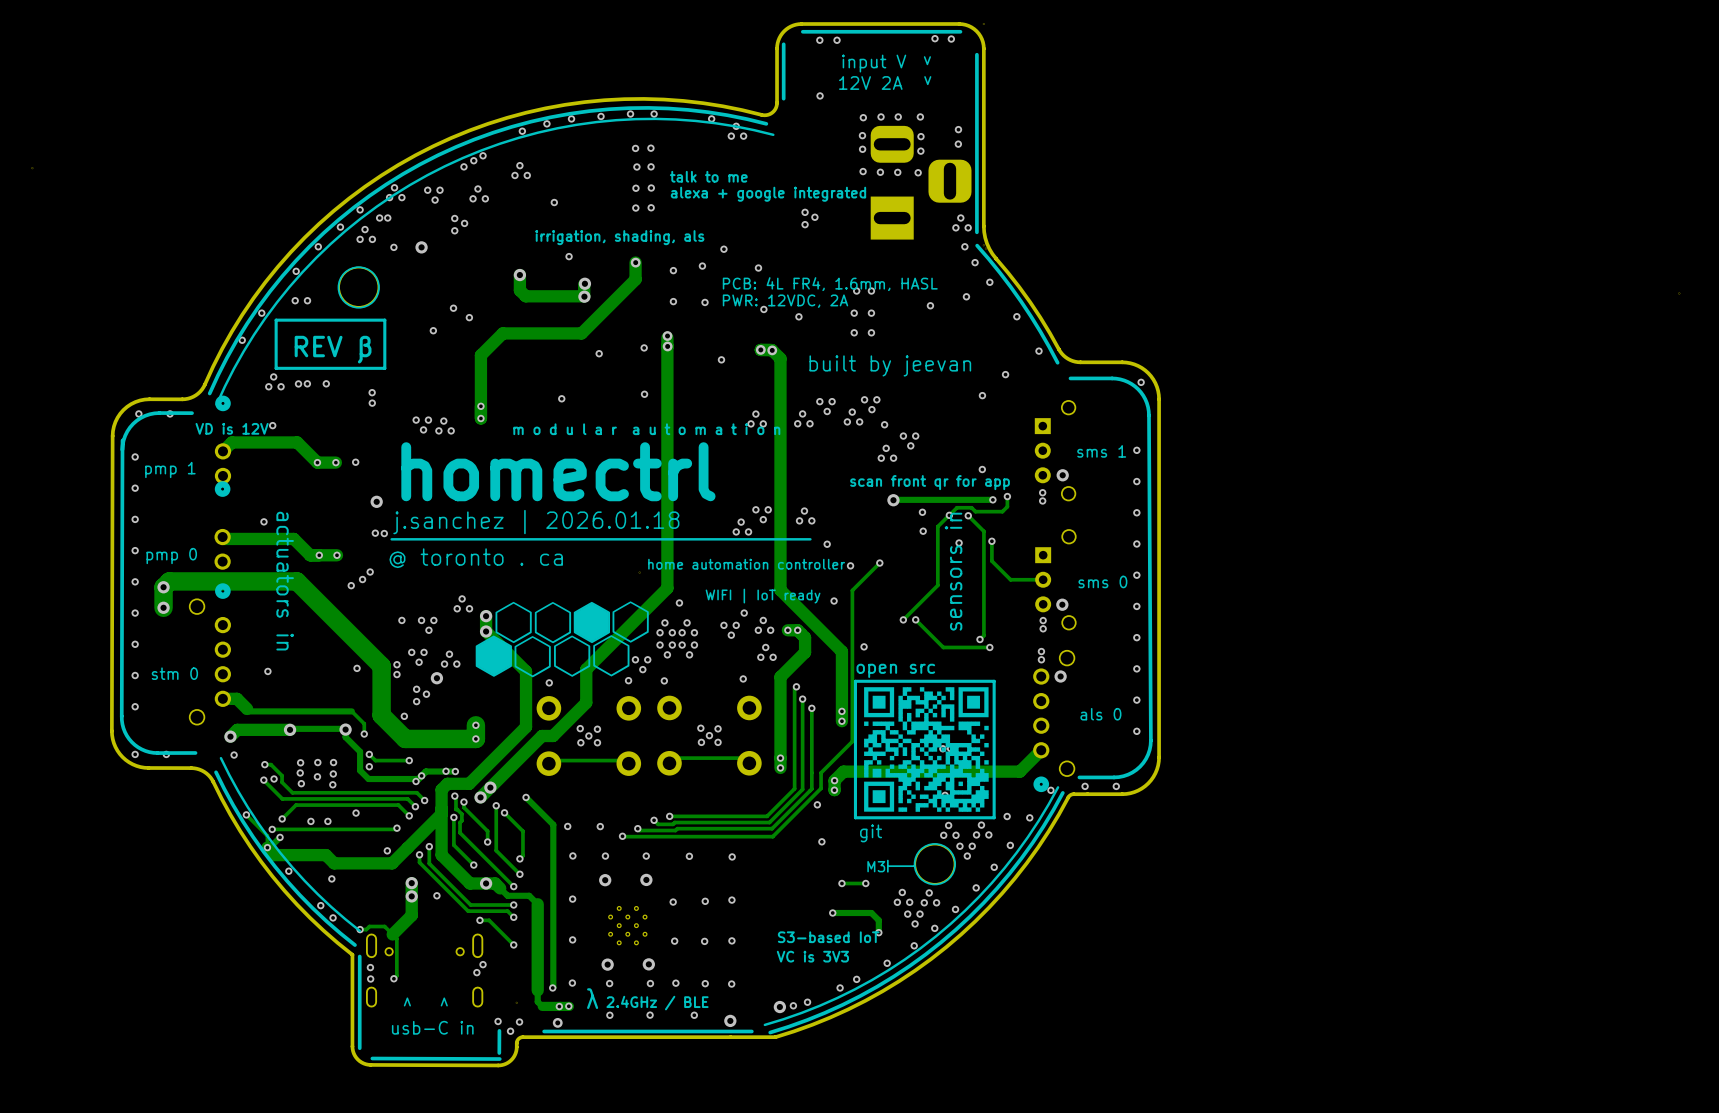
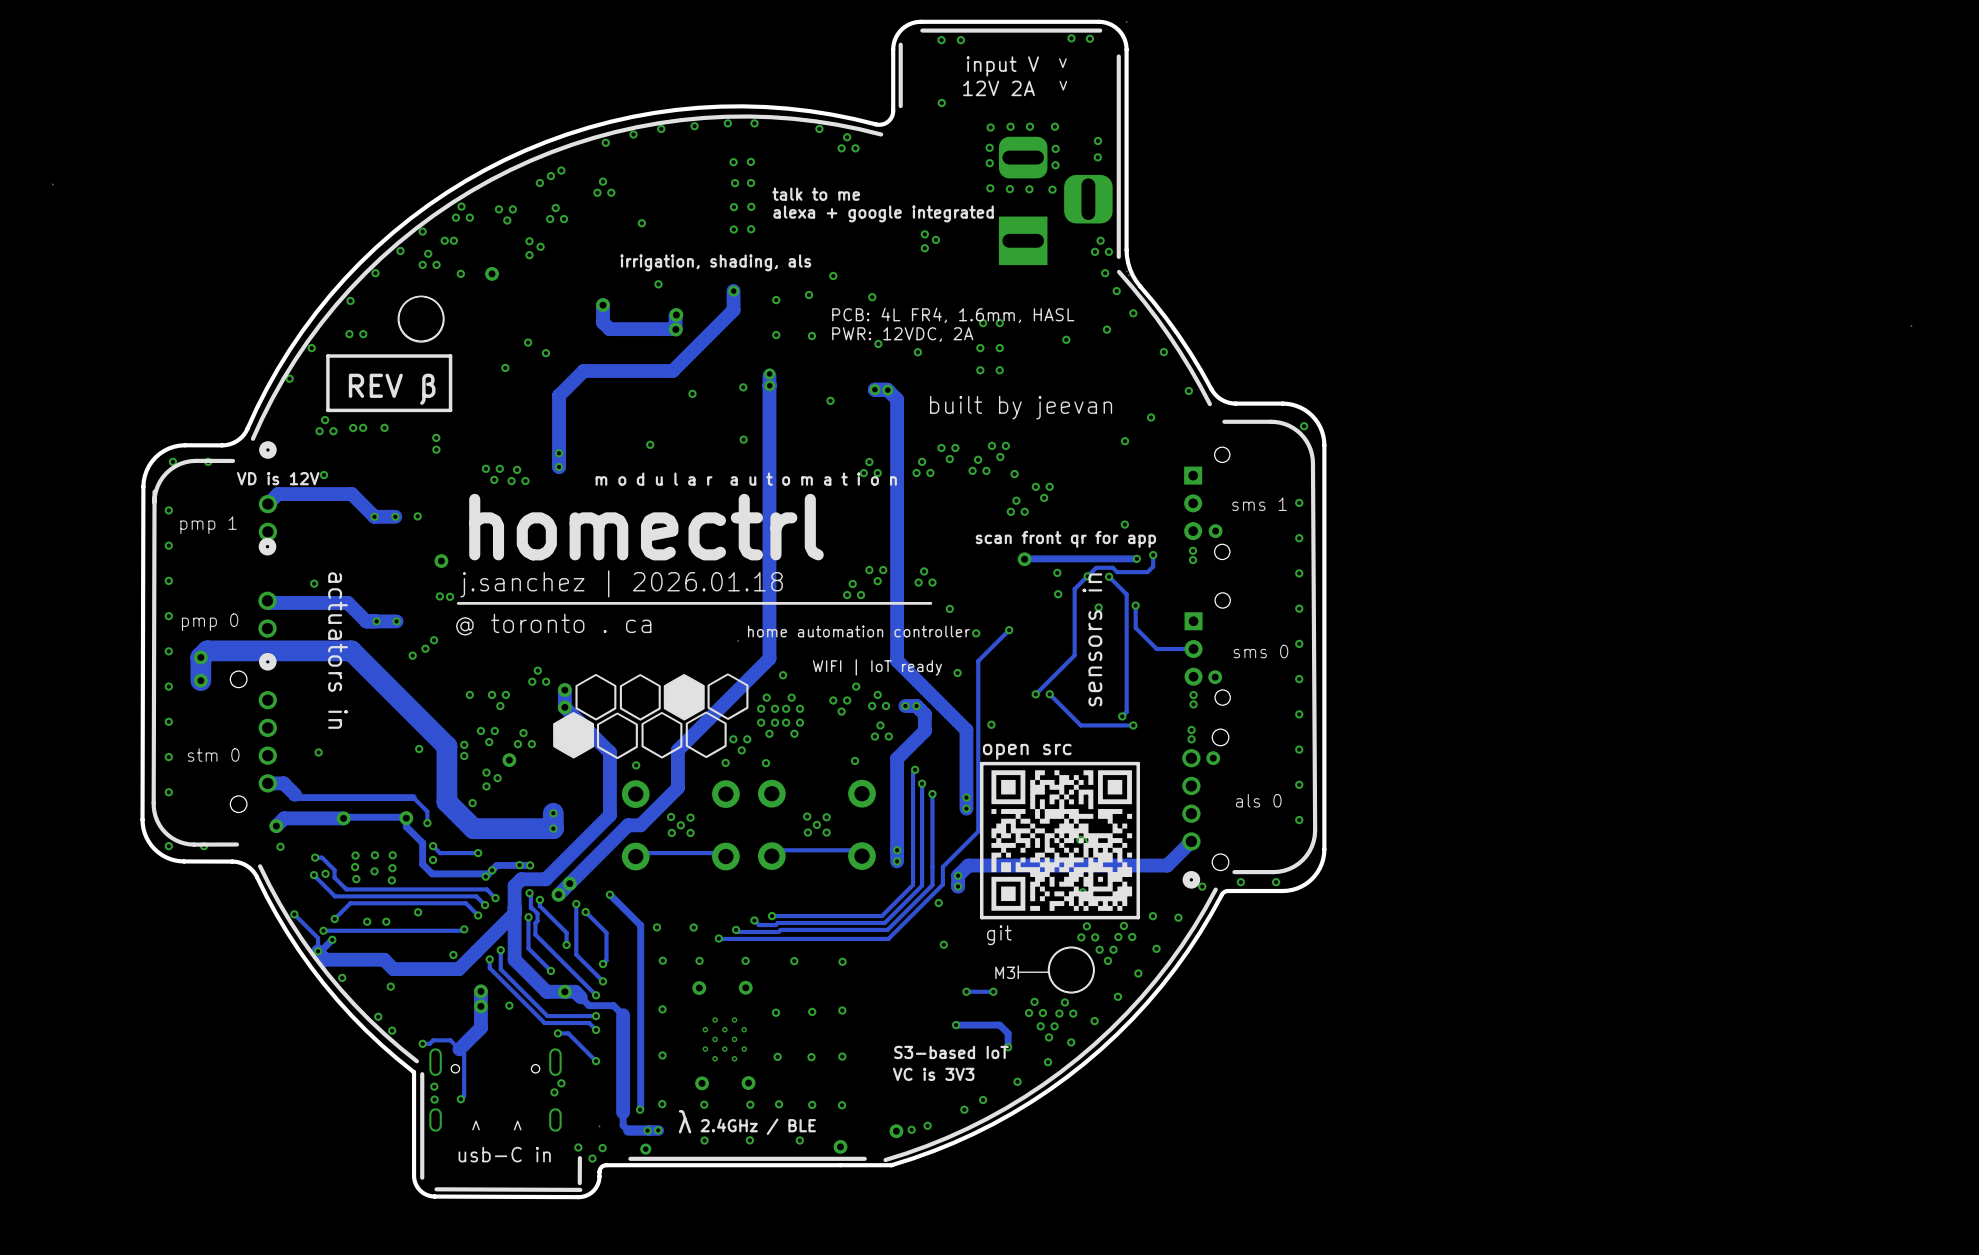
line: (773, 134) (734, 126) (695, 120) (655, 118) (616, 120) (576, 124) (518, 137) (481, 150) (444, 166) (410, 185) (376, 206) (330, 244) (302, 272) (277, 302) (254, 334) (233, 368) (216, 404) -> none
line: (220, 758) (247, 807) (280, 852) (317, 894) (359, 930) -> none
line: (1058, 787) (1027, 837) (1004, 868) (978, 897) (935, 936) (888, 970) (854, 989) (801, 1012) (764, 1024) -> none

